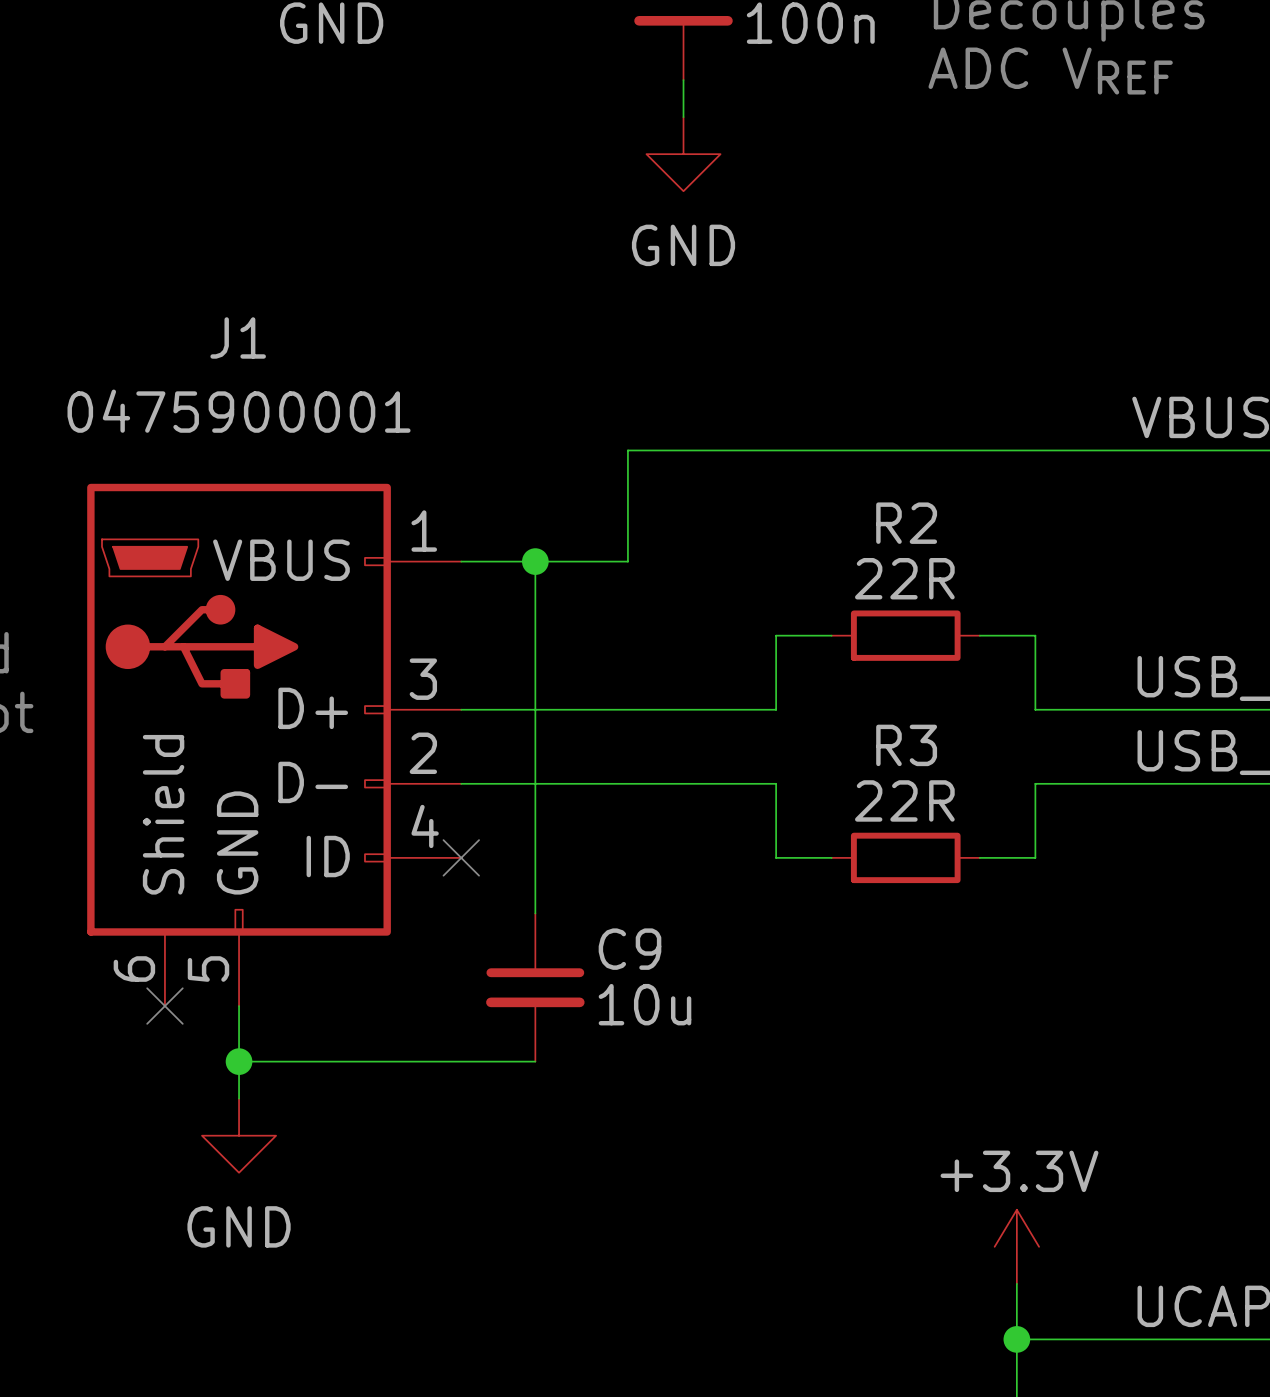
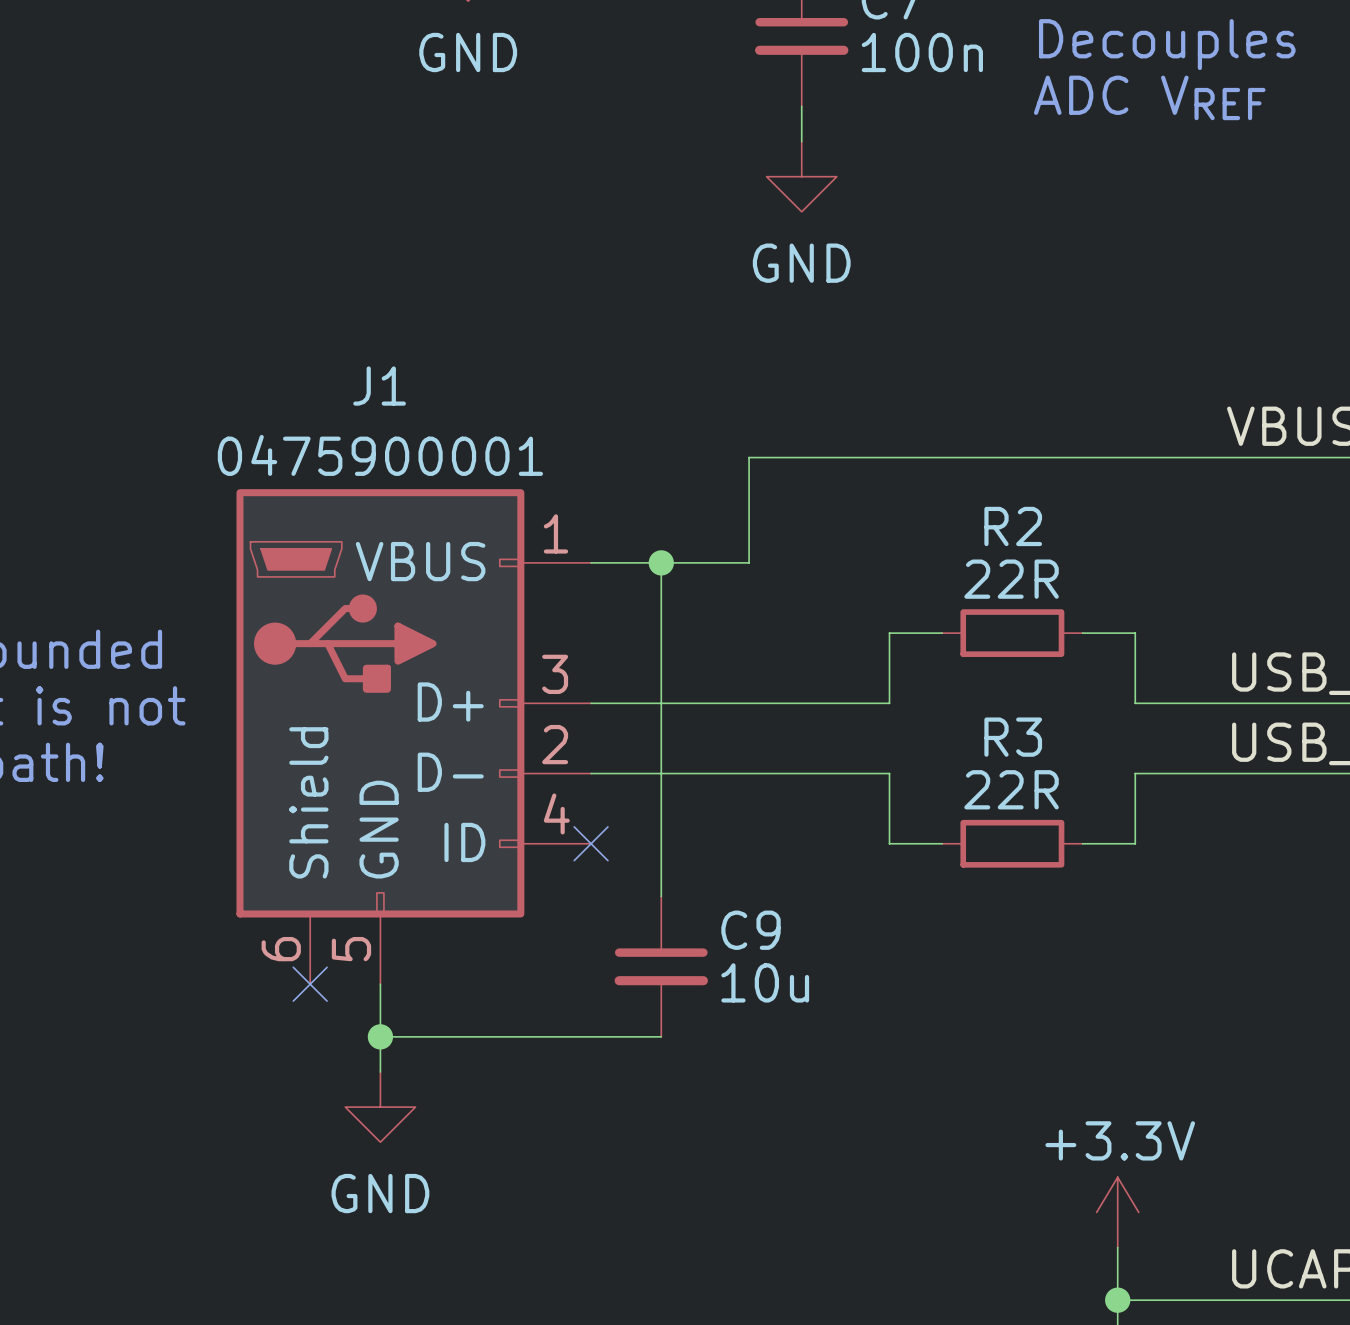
J1 name position: J1 (238, 337) -> J1 (379, 386)
J1 value position: 0475900001 (239, 411) -> 0475900001 (380, 455)

